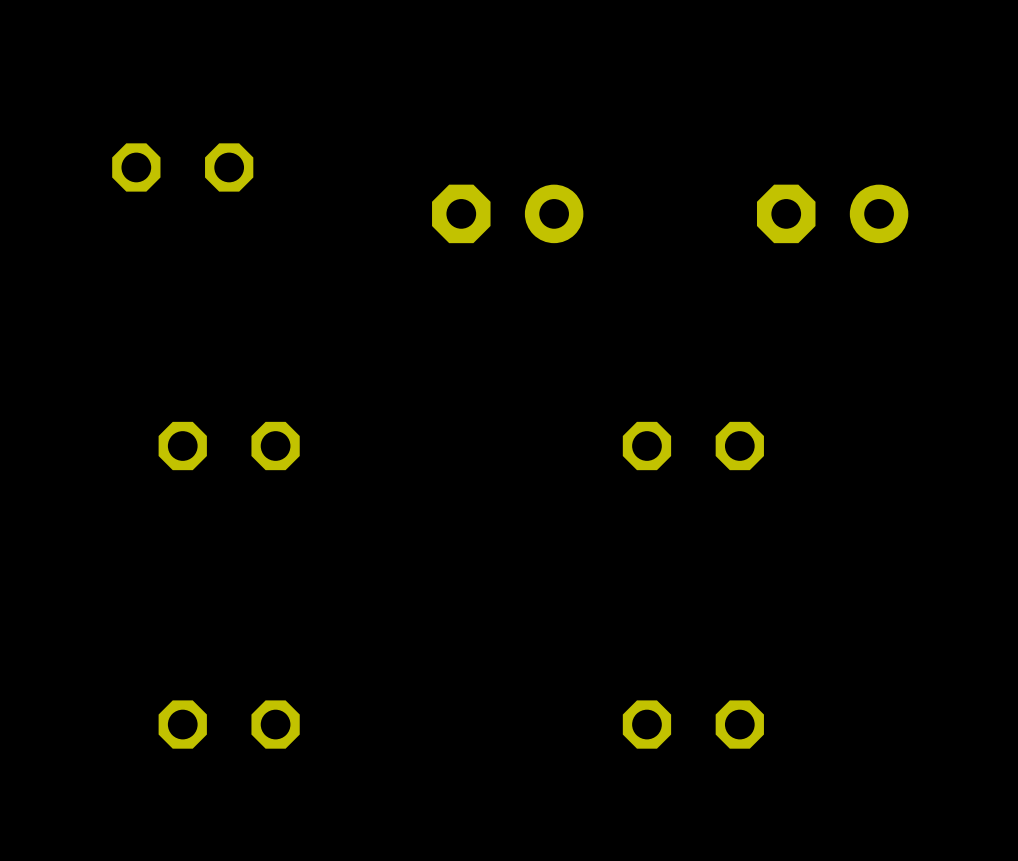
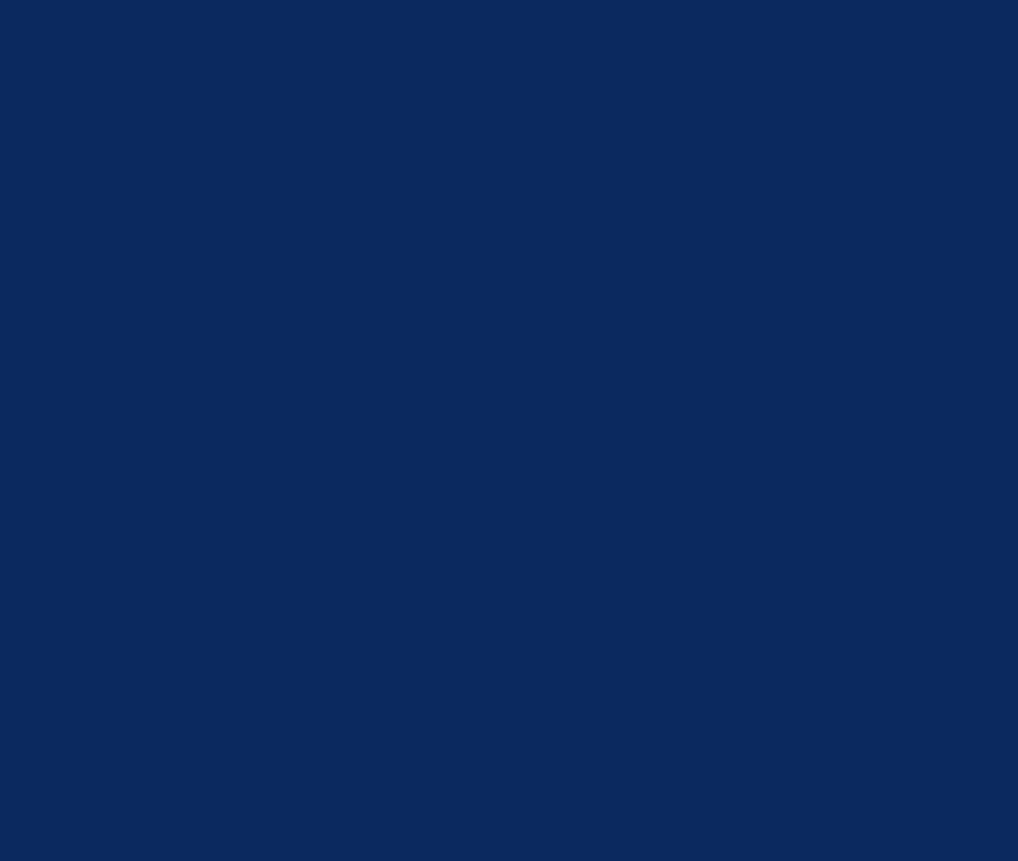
part: (182, 167) -> none
part: (507, 213) -> none
part: (832, 213) -> none
part: (229, 446) -> none
part: (693, 446) -> none
part: (229, 724) -> none
part: (693, 724) -> none

